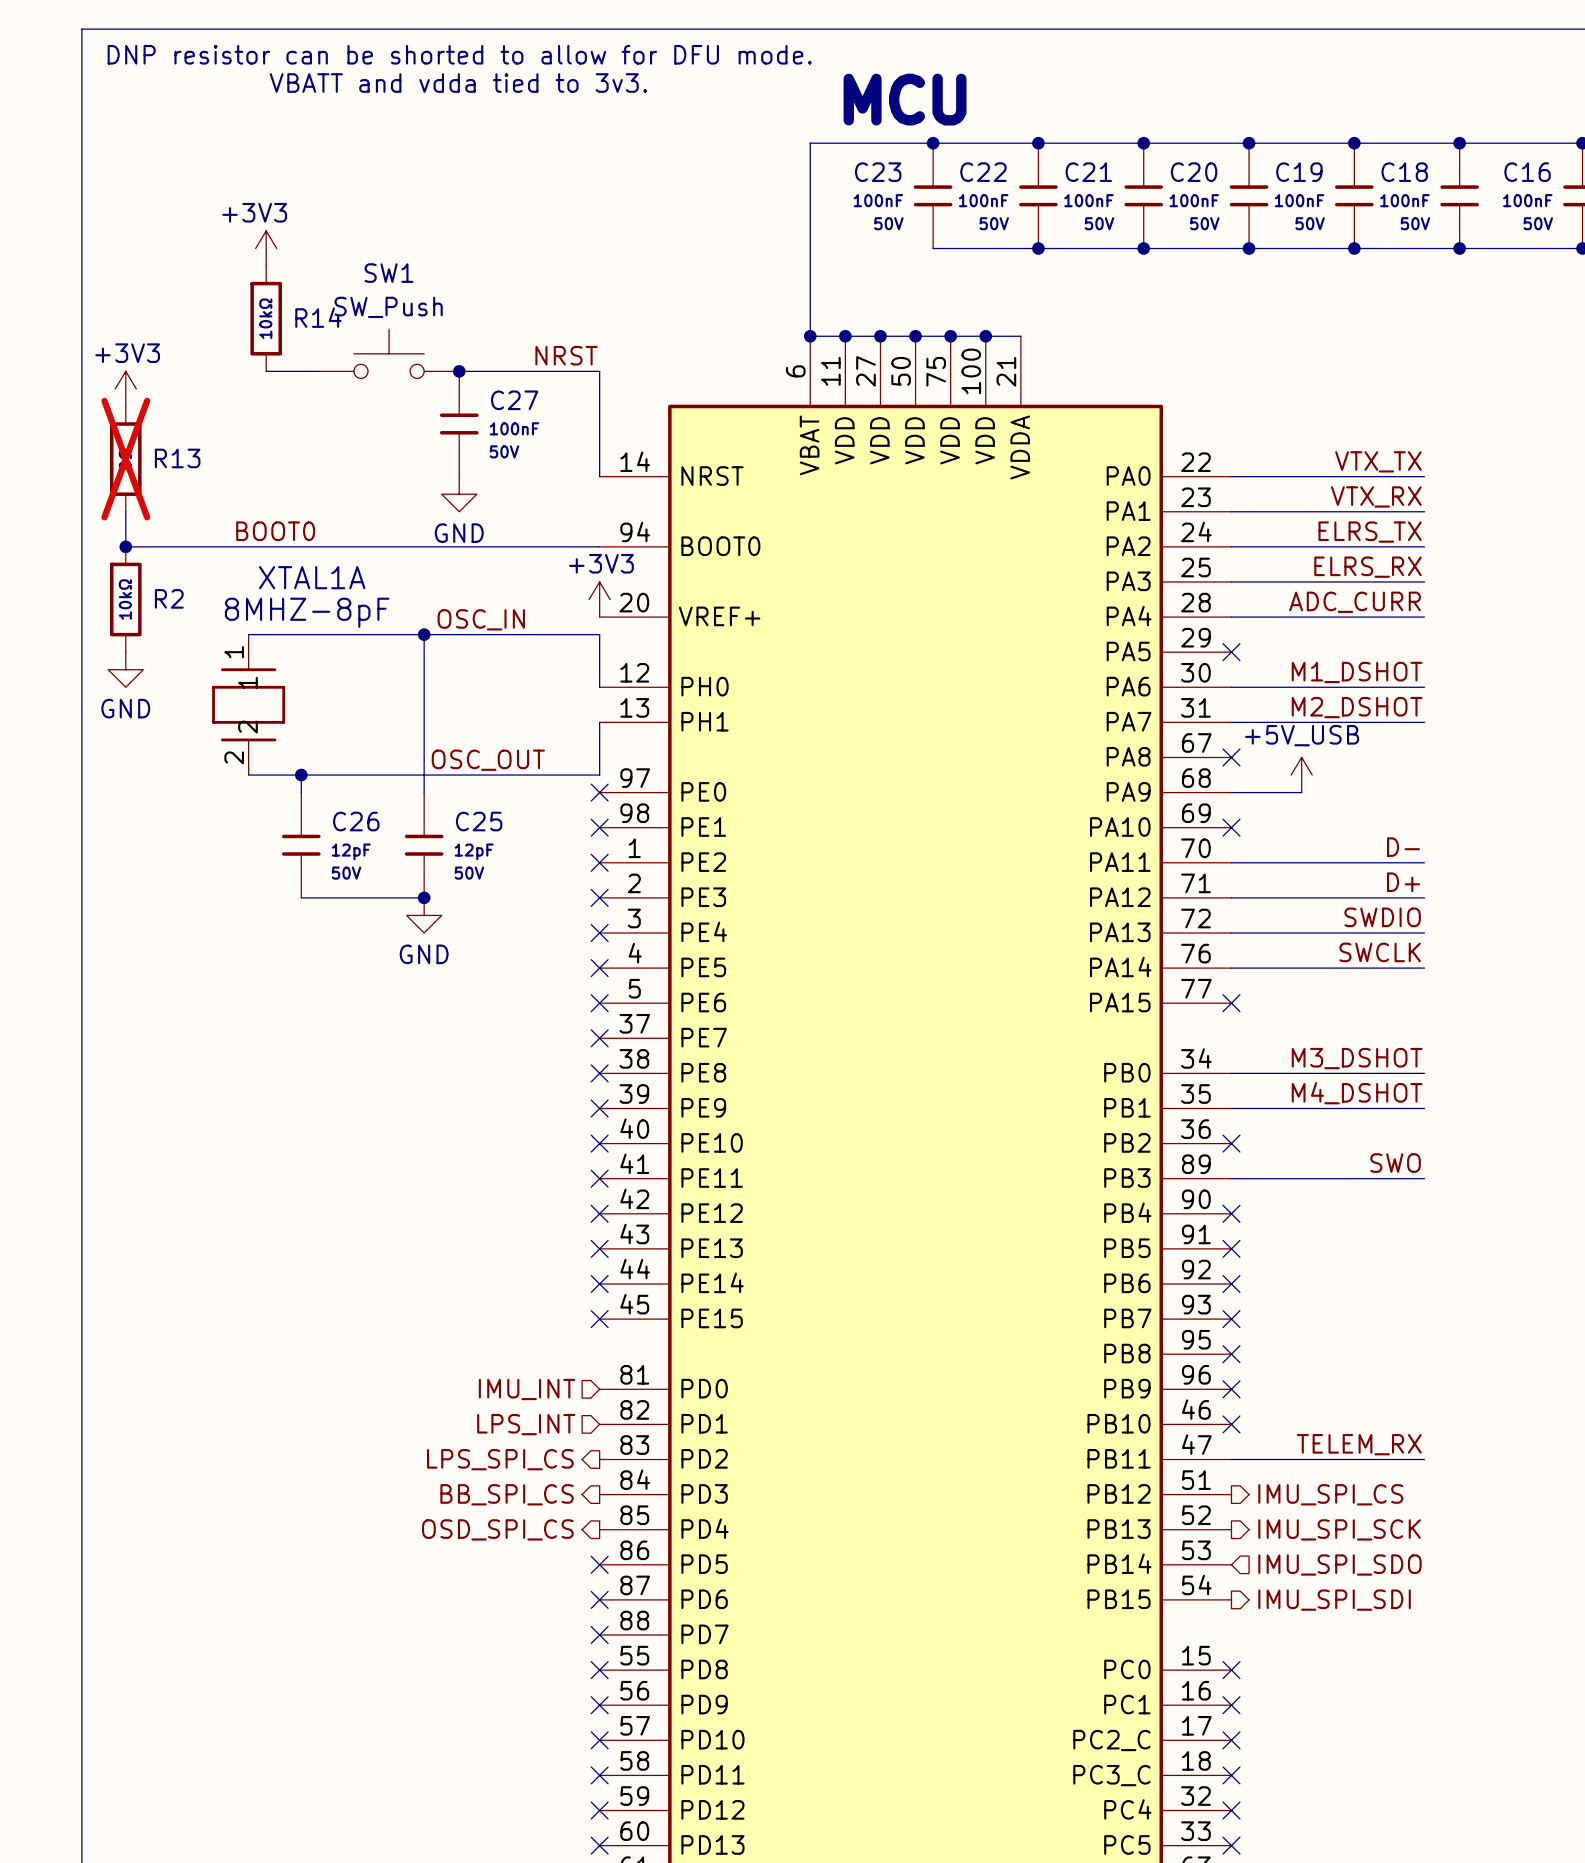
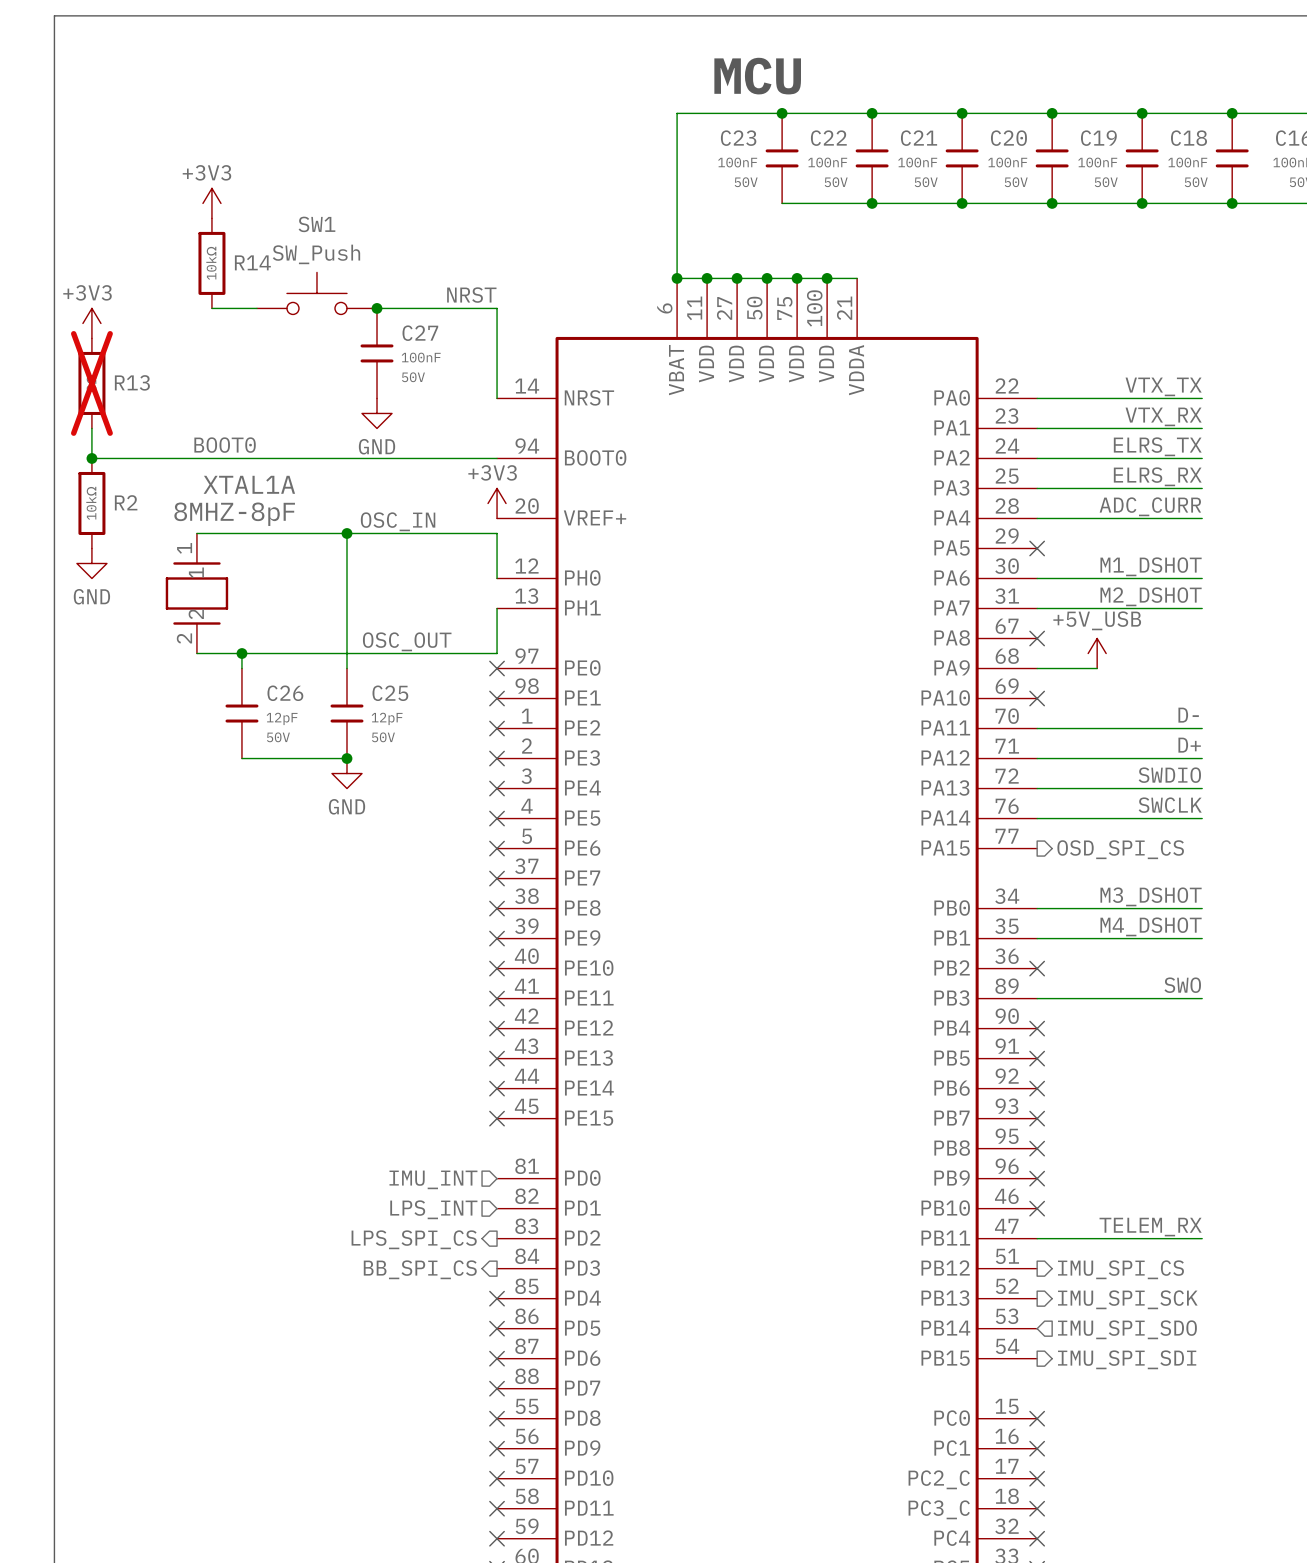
text: DNP resistor can be shorted to allow for DFU mode. (459, 54) -> none
text: VBATT and vdda tied to 3v3. (458, 83) -> none
no-connect mark: (1231, 1003) -> none
hierarchical label: none -> OSD_SPI_CS (1120, 849)
hierarchical label: OSD_SPI_CS (497, 1529) -> none
no-connect mark: none -> (497, 1298)

